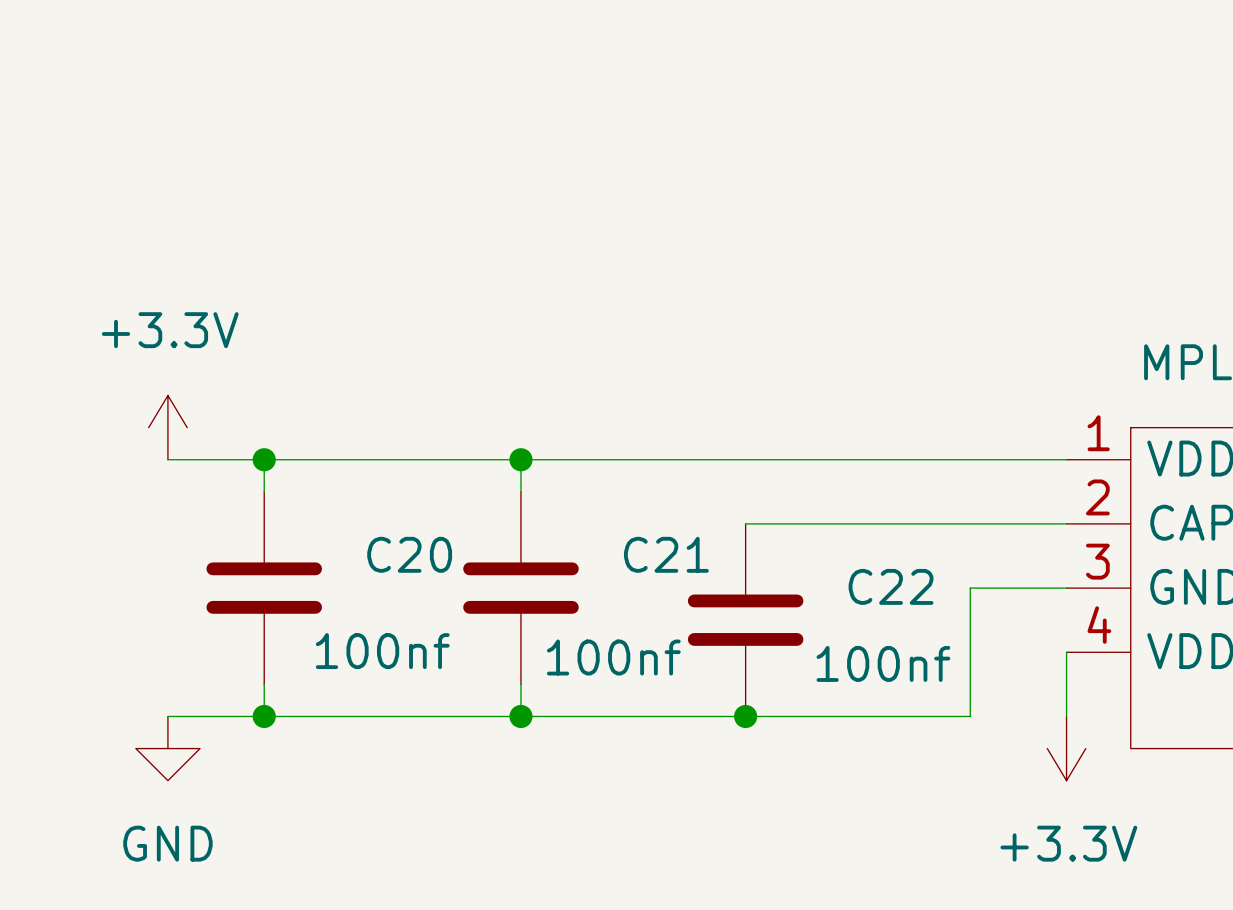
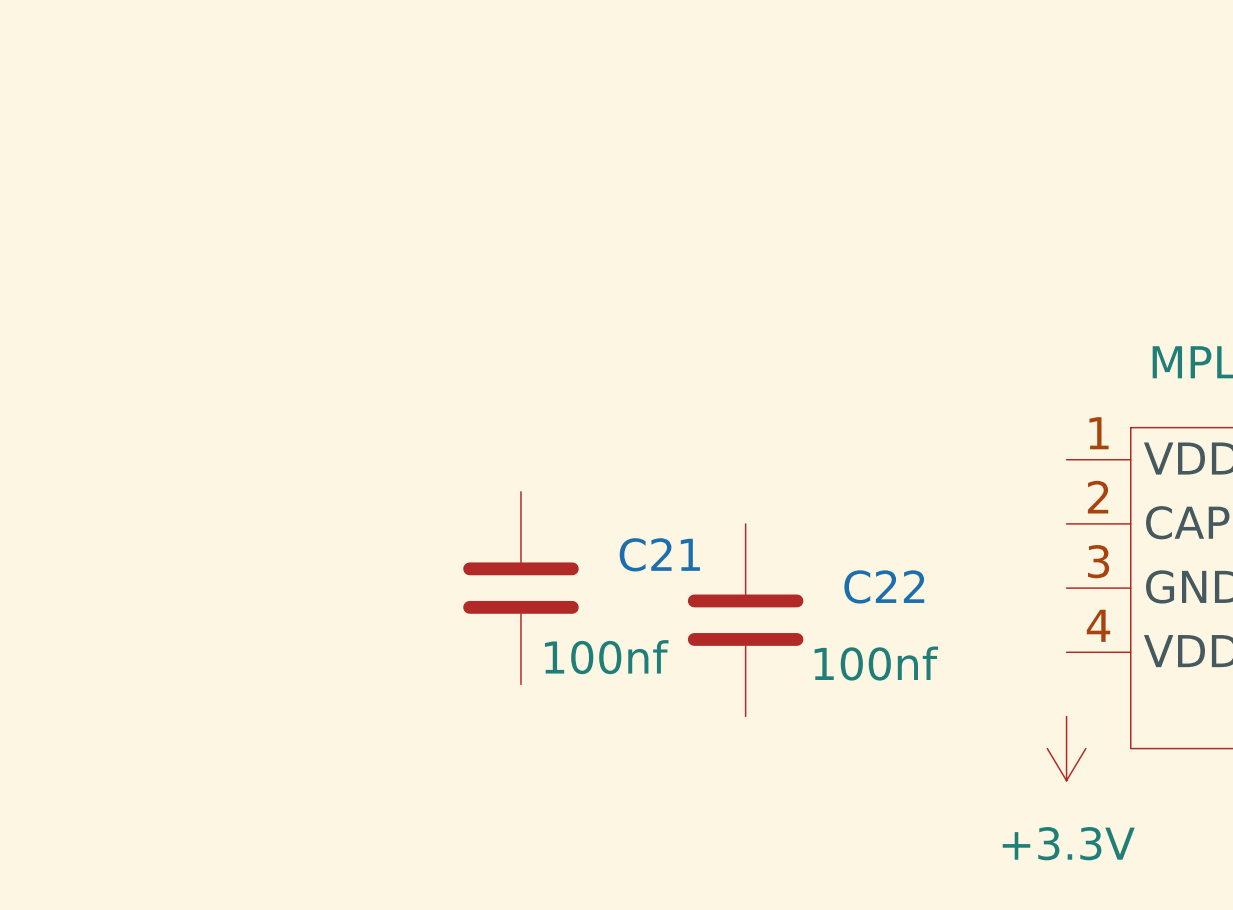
power symbol: +3.3V (167, 427) -> none
wire: (167, 459) (1066, 459) -> none
wire: (264, 459) (264, 491) -> none
junction: (264, 459) -> none
wire: (520, 459) (520, 491) -> none
junction: (520, 459) -> none
wire: (745, 523) (1066, 523) -> none
C20: 100nf (264, 588) -> none
wire: (1066, 588) (970, 588) (970, 716) (167, 716) -> none
wire: (1066, 652) (1066, 716) -> none
wire: (264, 684) (264, 716) -> none
wire: (520, 684) (520, 716) -> none
junction: (264, 716) -> none
junction: (520, 716) -> none
junction: (745, 716) -> none
power symbol: GND (167, 748) -> none

